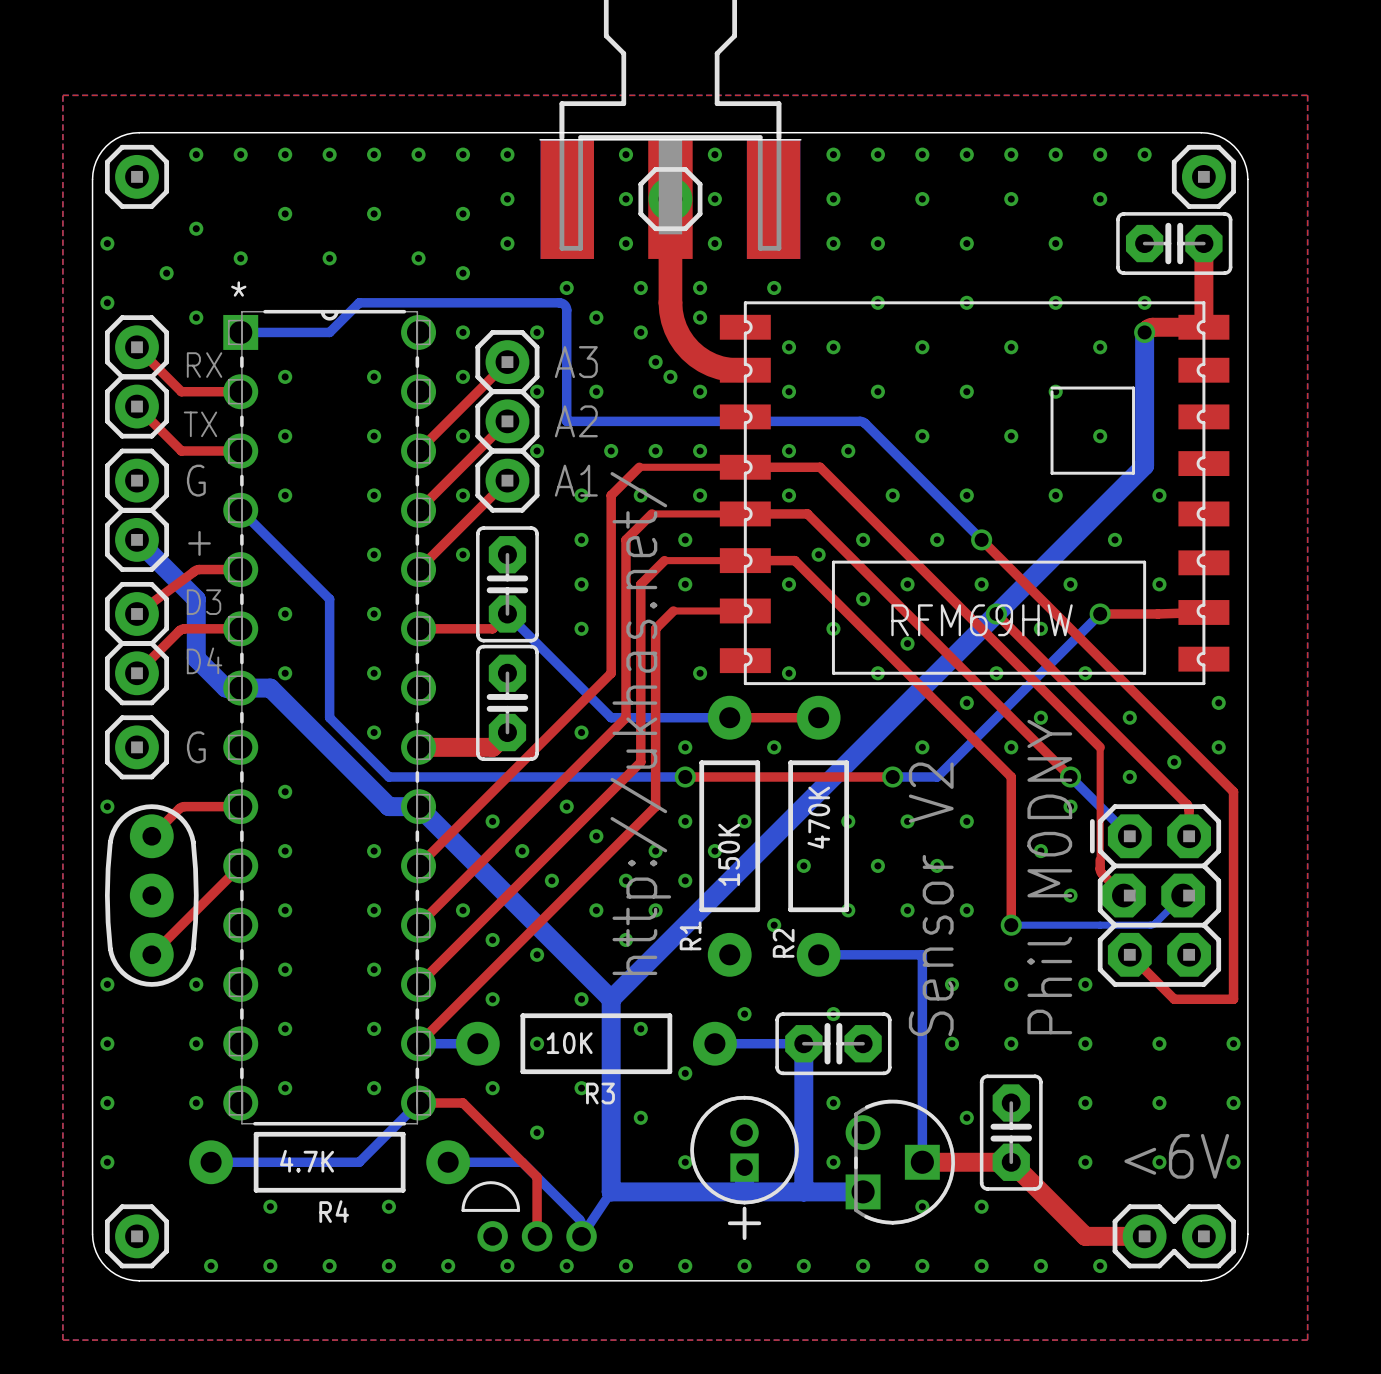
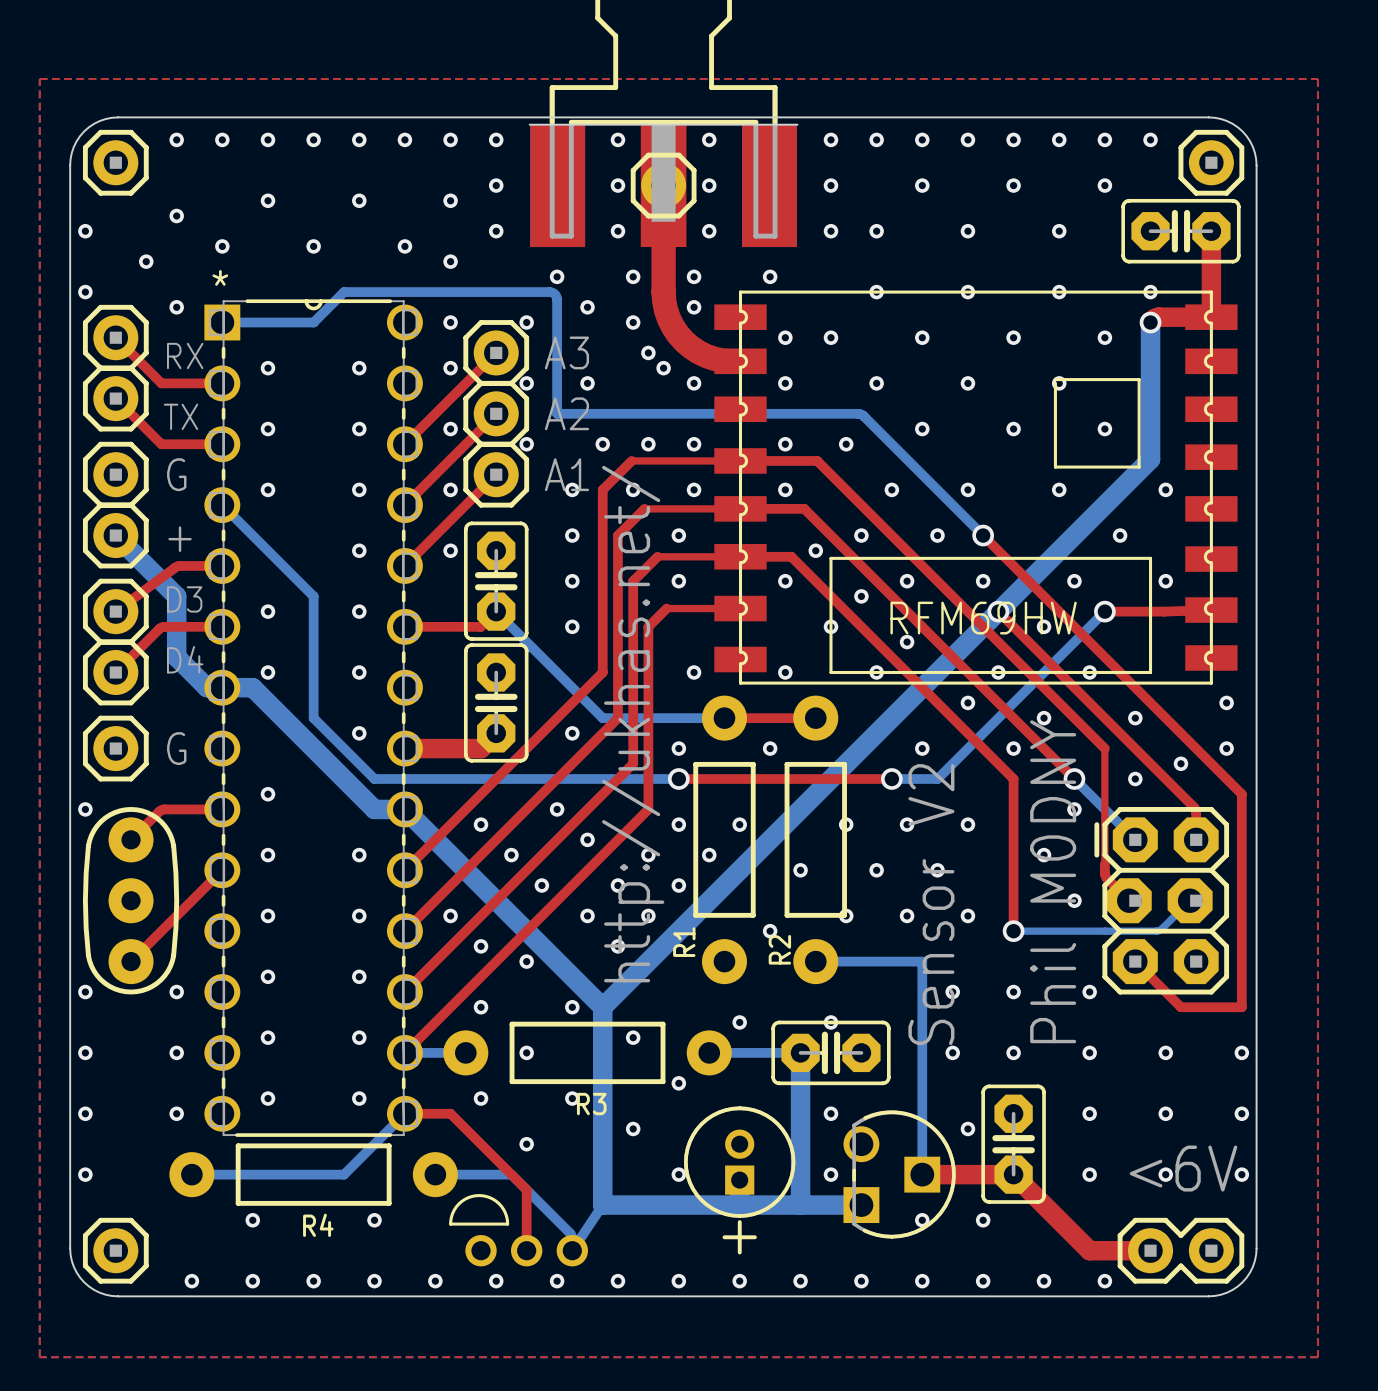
R2 value: 470K (818, 817) -> none
R1 value: 150K (729, 854) -> none
R3 value: 10K (569, 1043) -> none
R4 value: 4.7K (307, 1161) -> none

